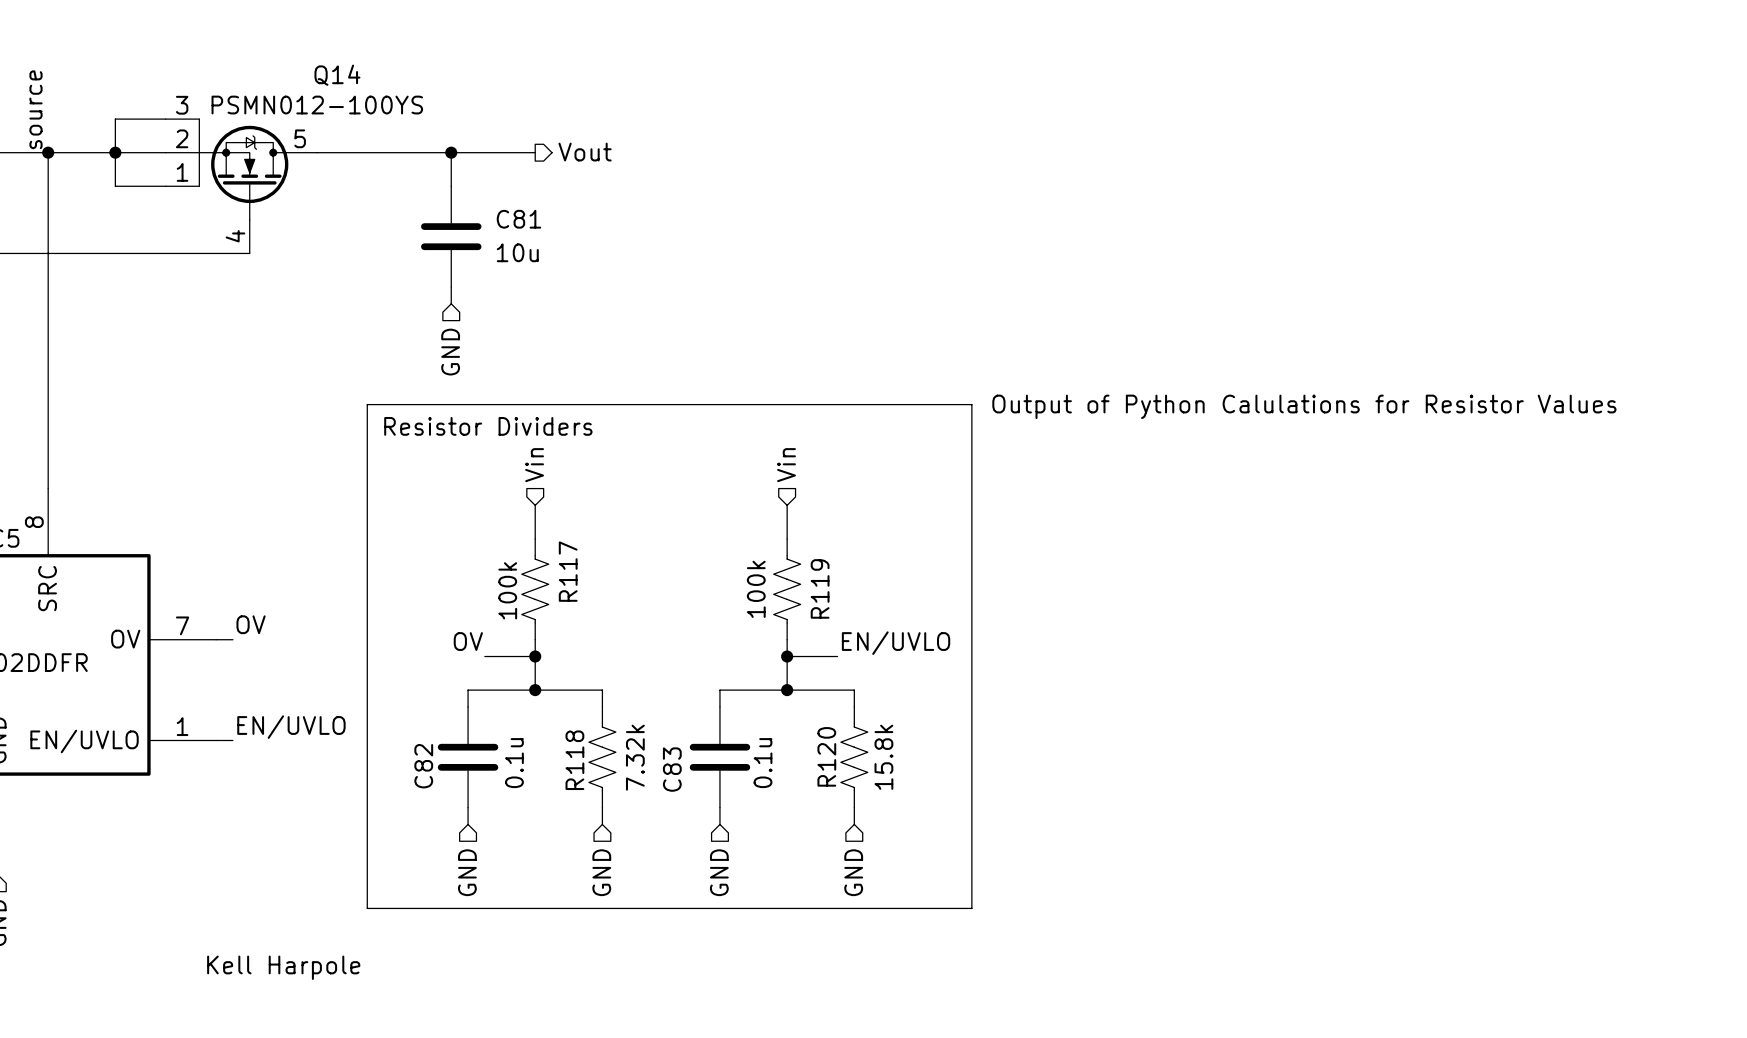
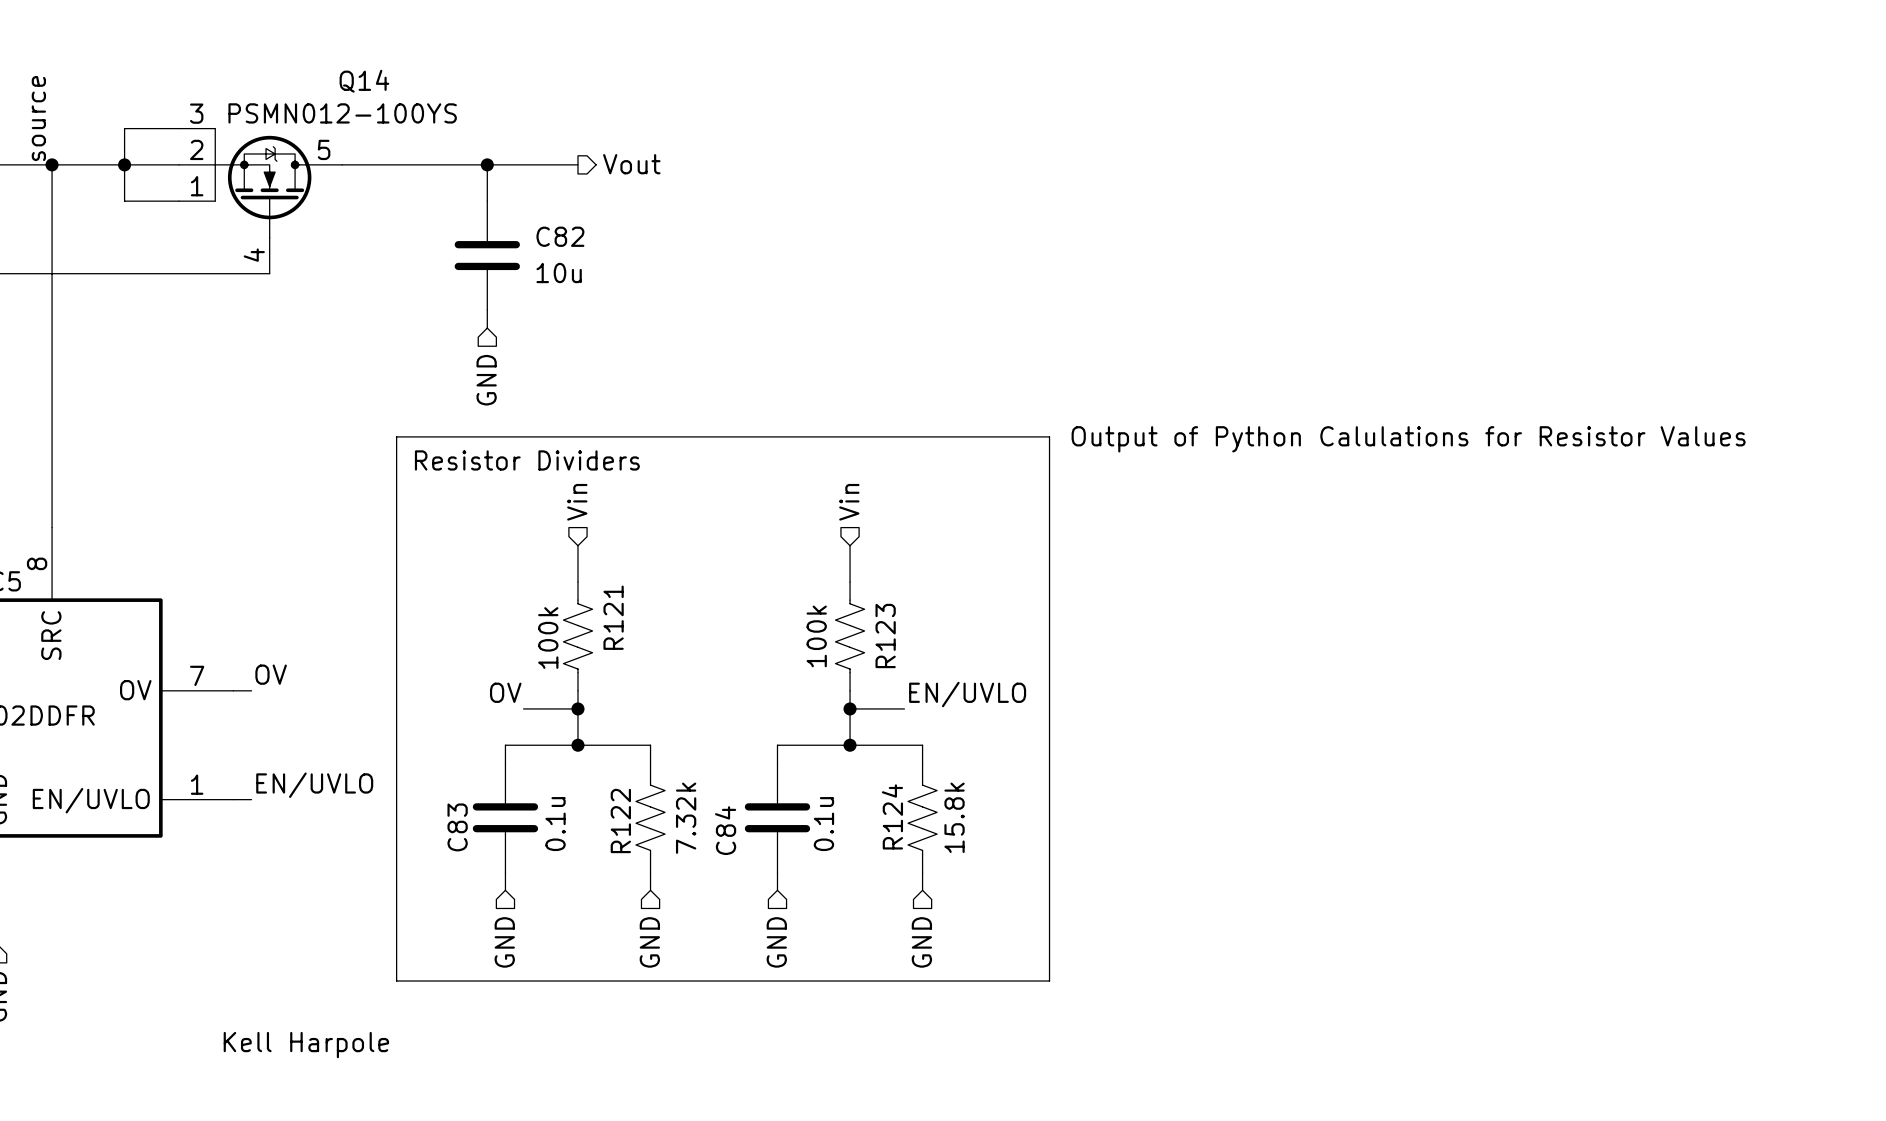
C81 name: C81 (518, 219) -> C82 (560, 236)
R117 name: R117 (568, 571) -> R121 (613, 617)
R119 name: R119 (820, 588) -> R123 (885, 635)
R120 name: R120 (826, 756) -> R124 (892, 816)
R118 name: R118 (574, 760) -> R122 (620, 820)
C82 name: C82 (423, 766) -> C83 (457, 827)
C83 name: C83 (672, 769) -> C84 (725, 830)

